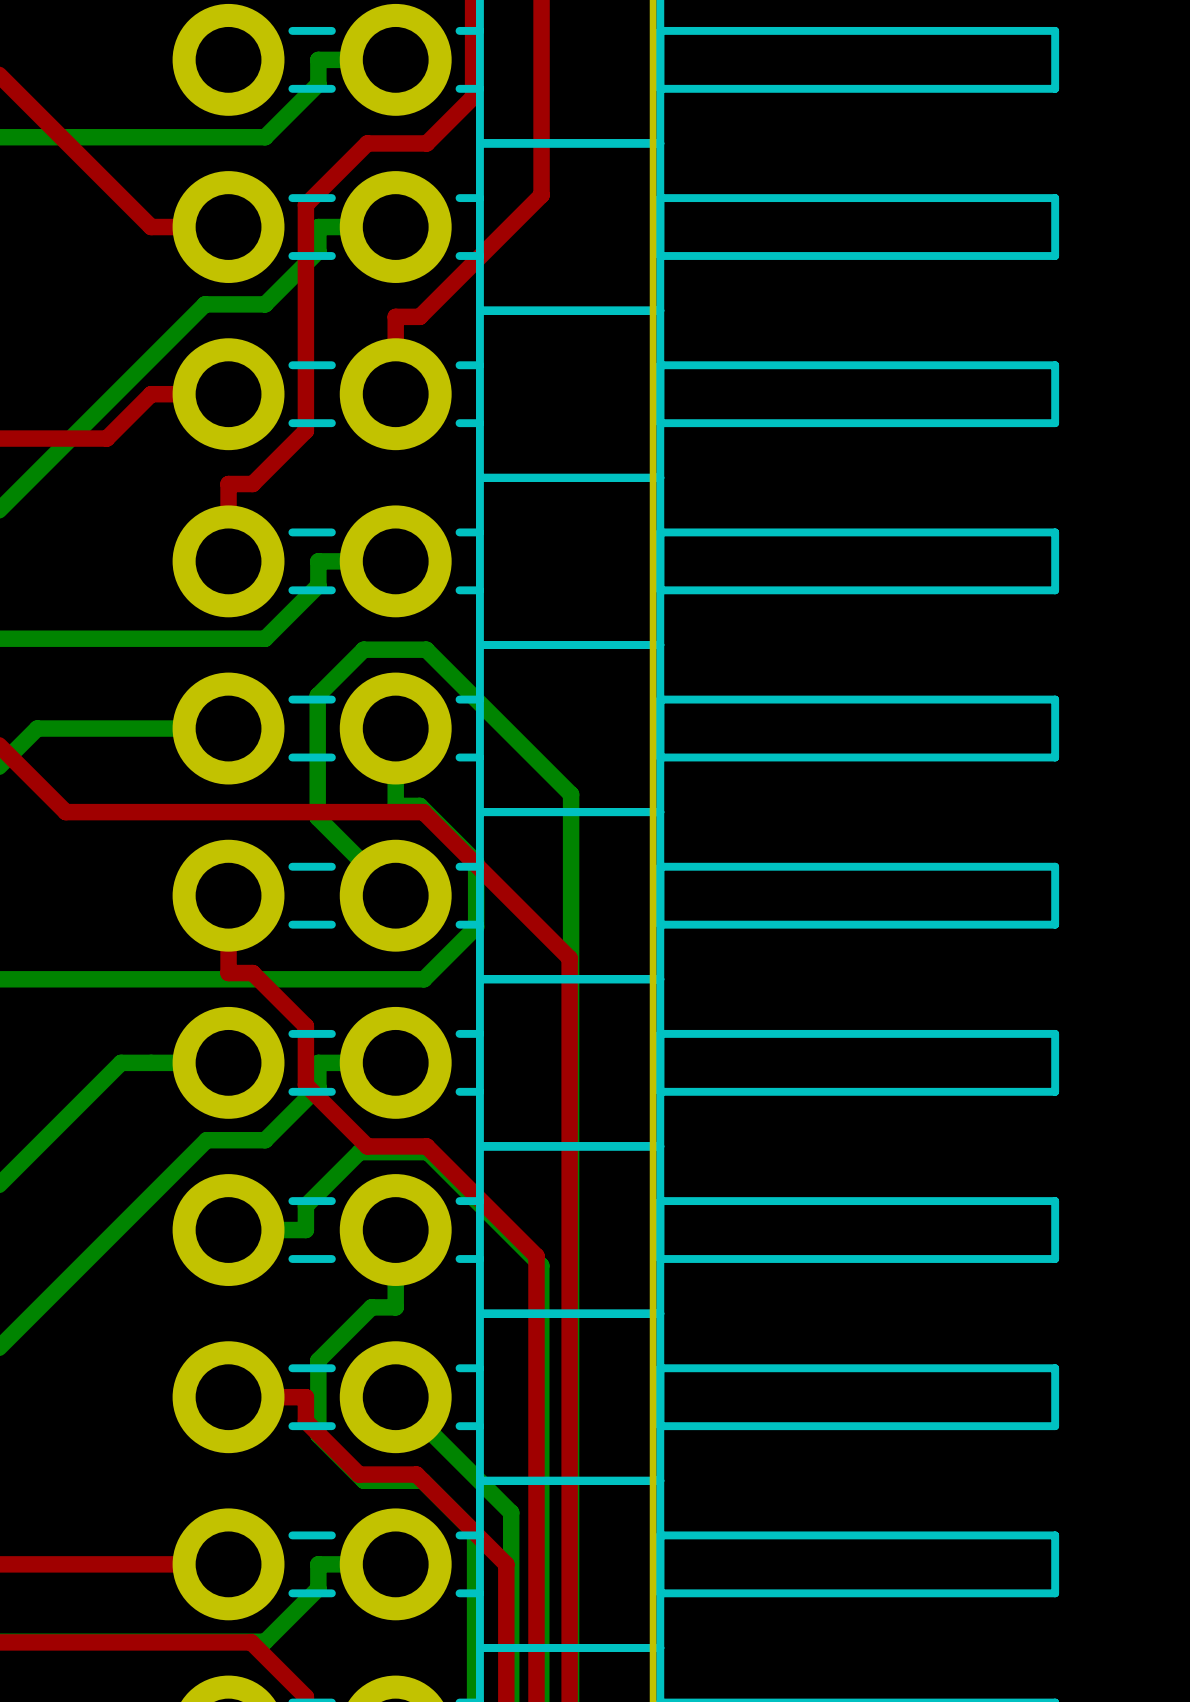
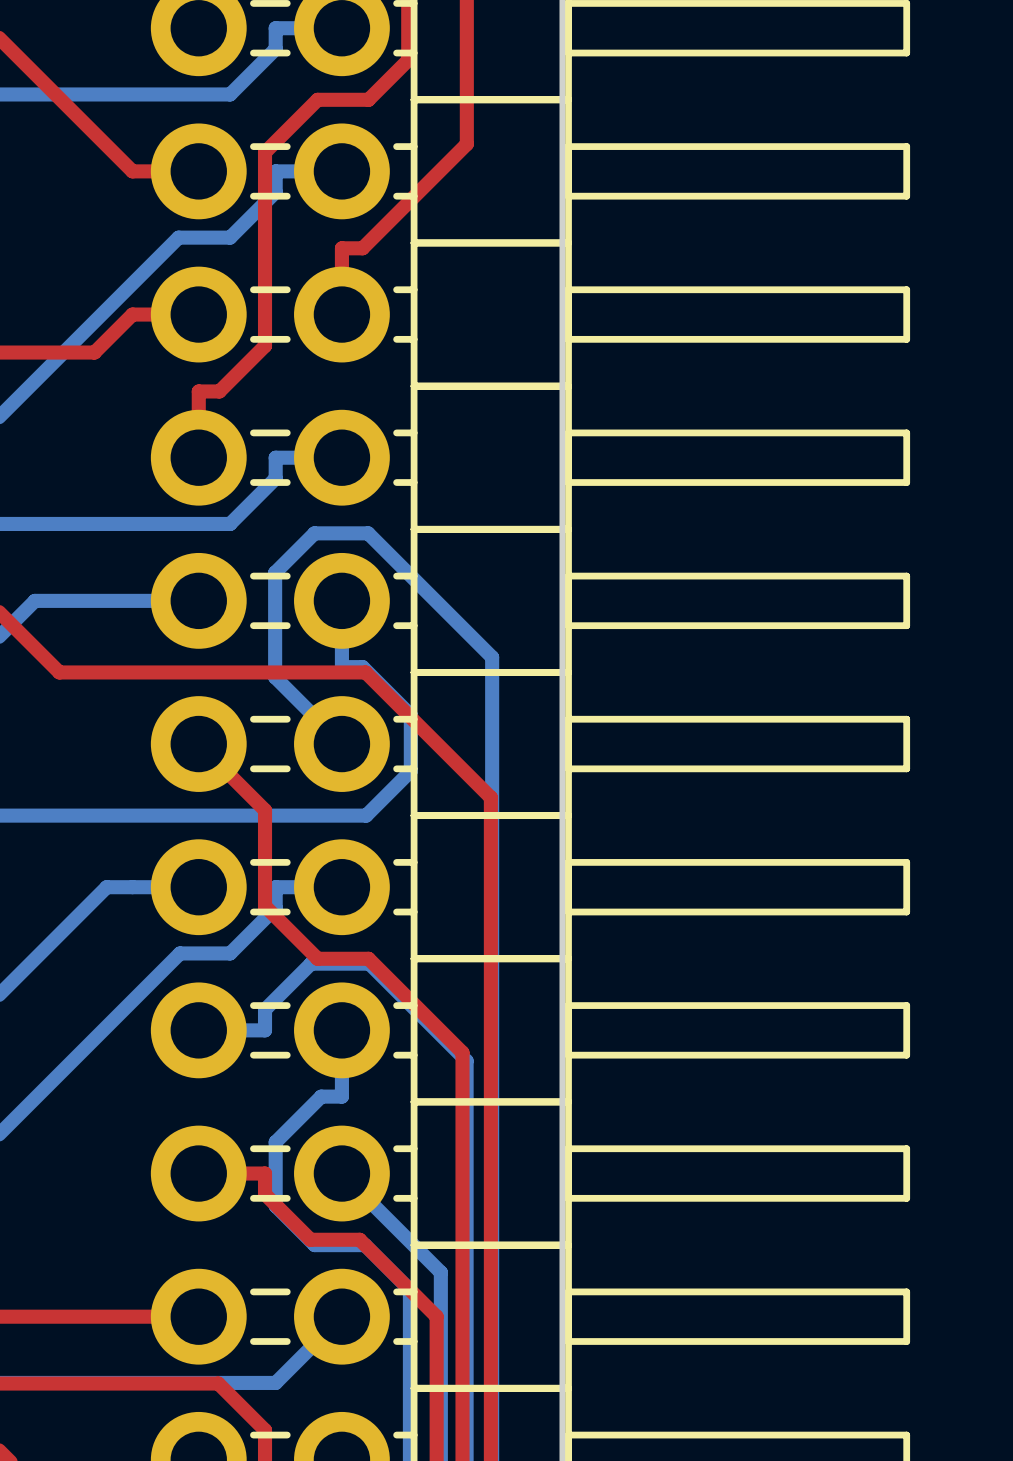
top track: (228, 895) (228, 973) (252, 973) (305, 1026) -> (198, 744) (265, 810) (265, 855)
bottom track: (395, 1564) (318, 1564) (318, 1588) (265, 1641) -> (341, 1316) (275, 1382) (230, 1382)

